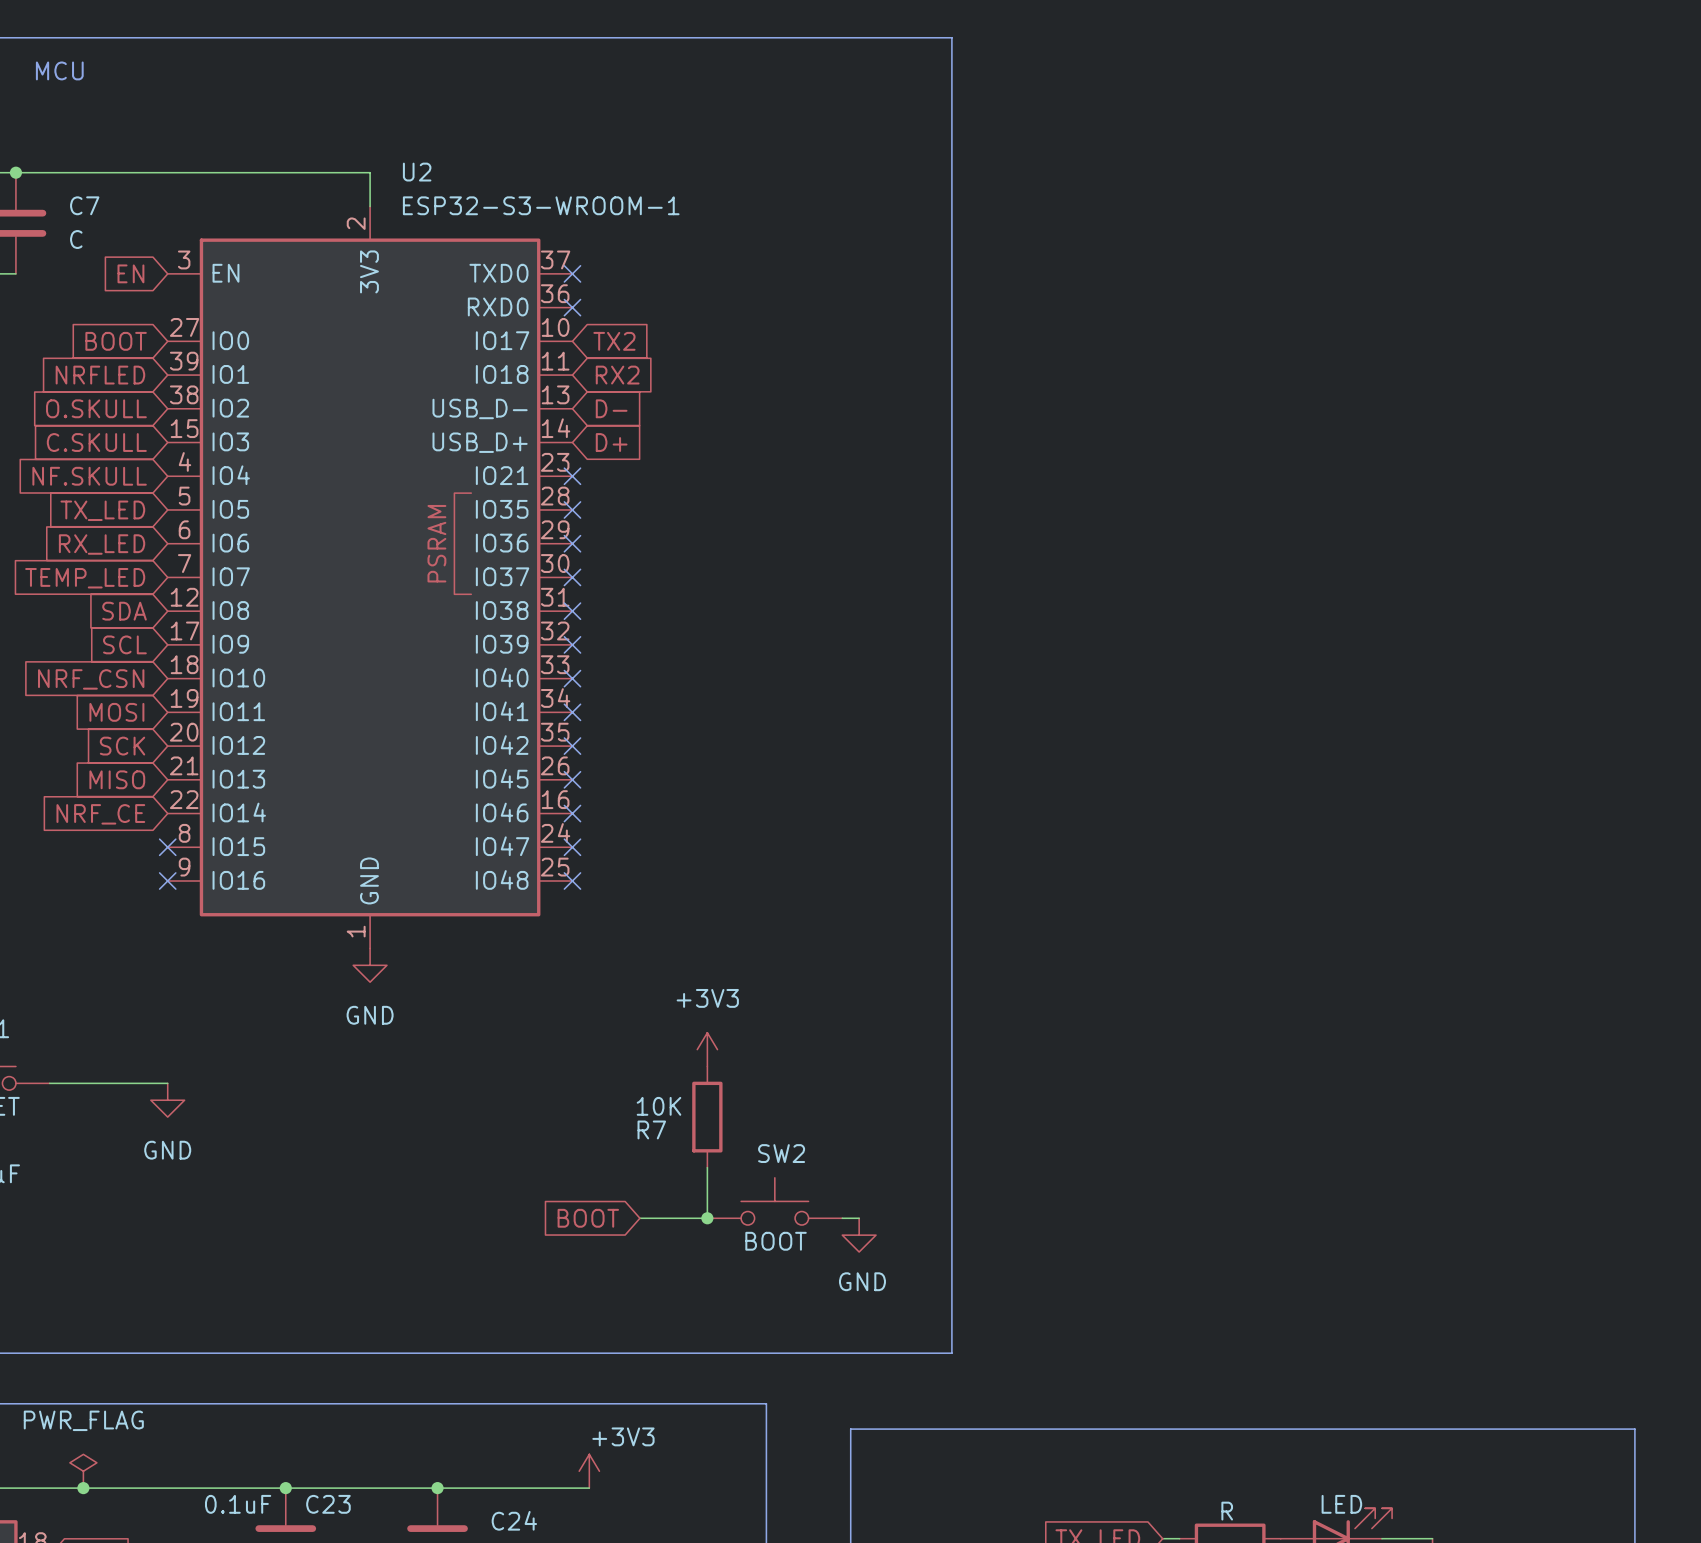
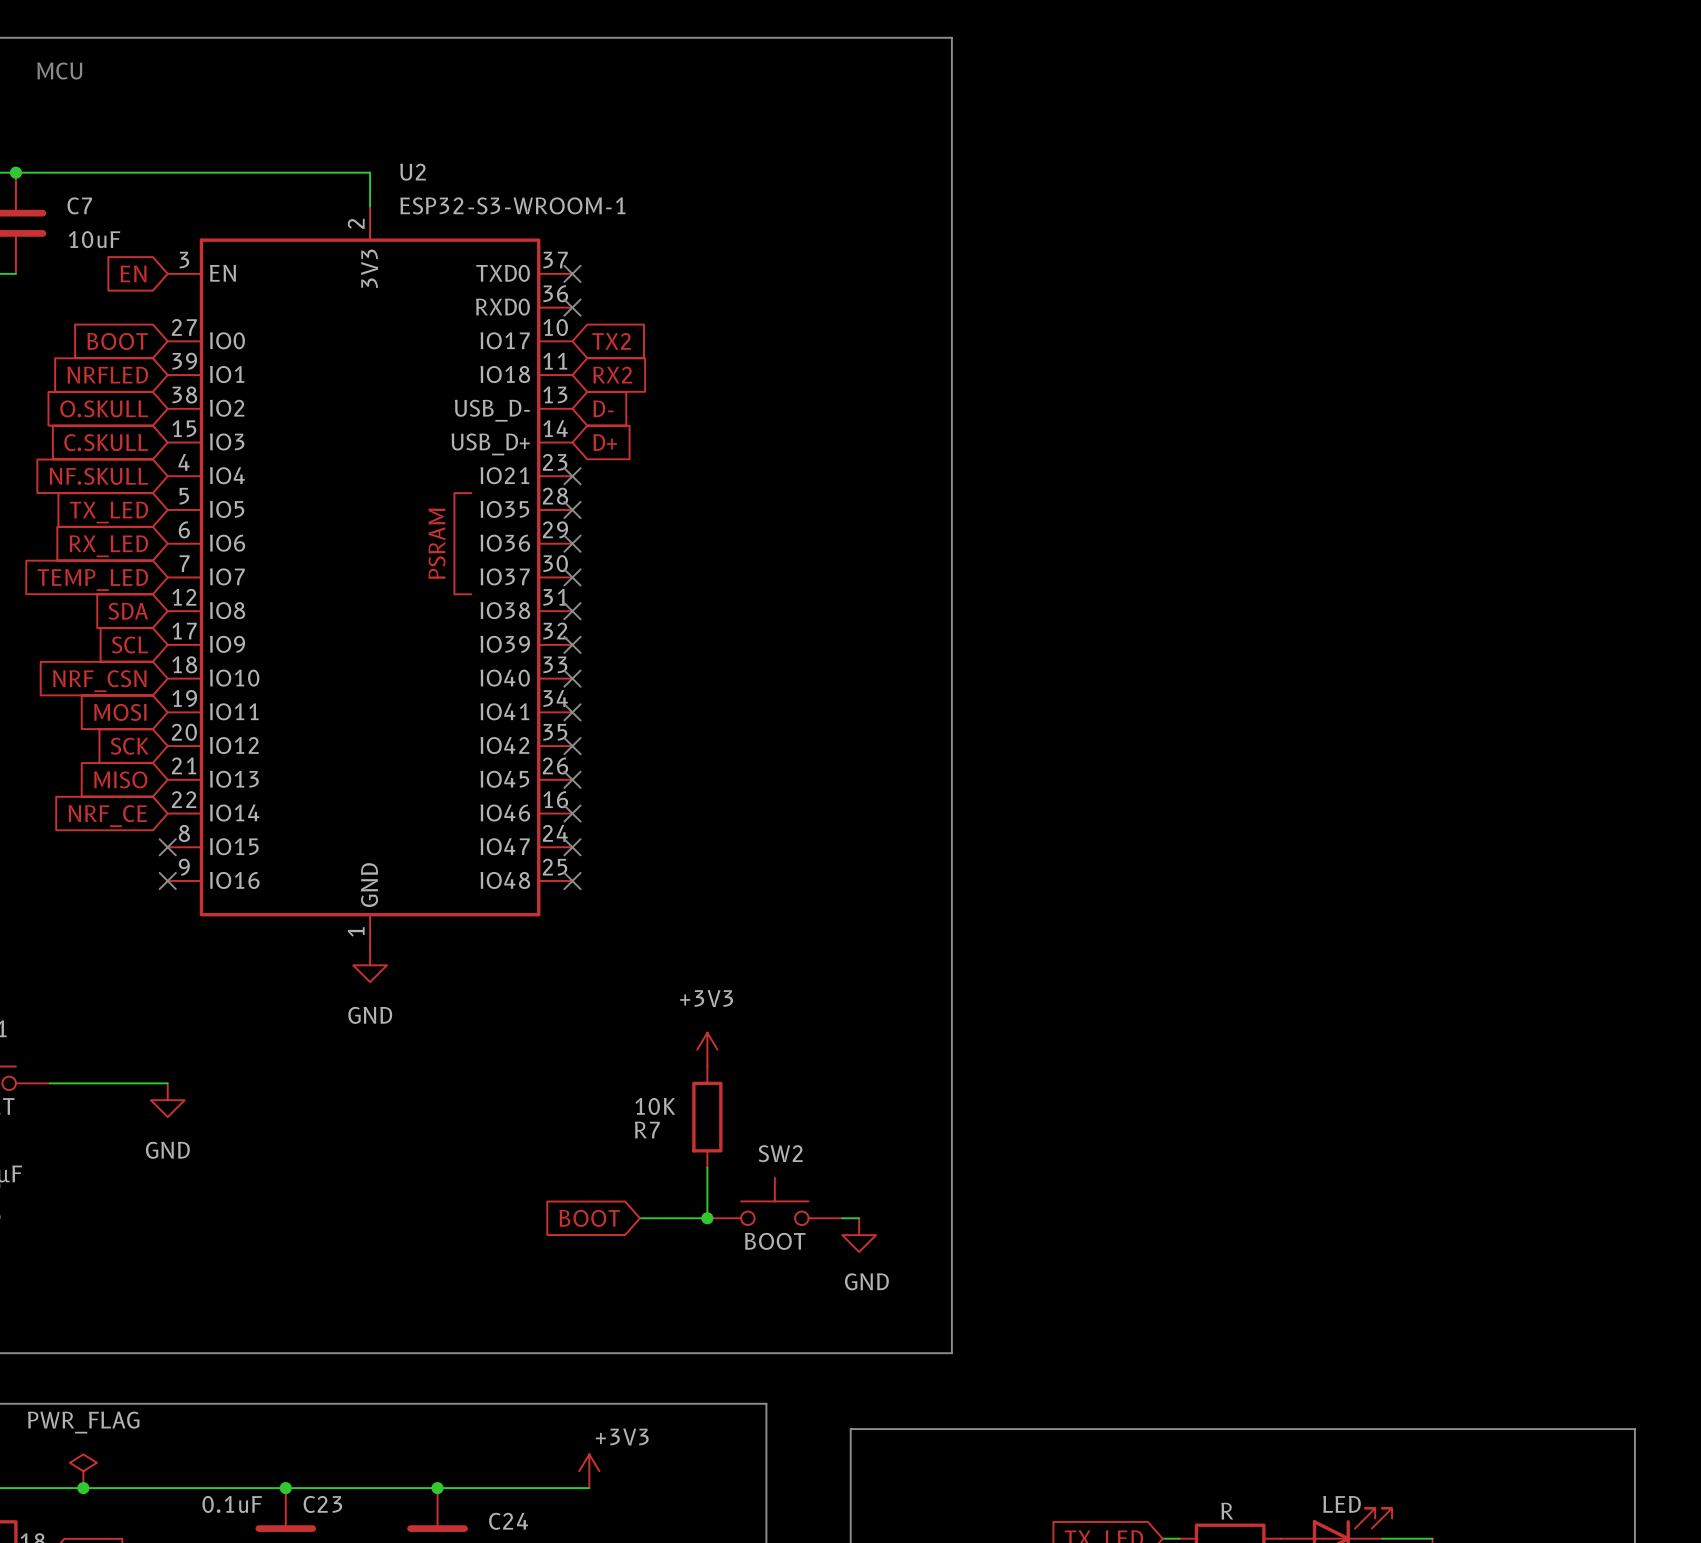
C7 value: C (76, 239) -> 10uF (94, 239)

